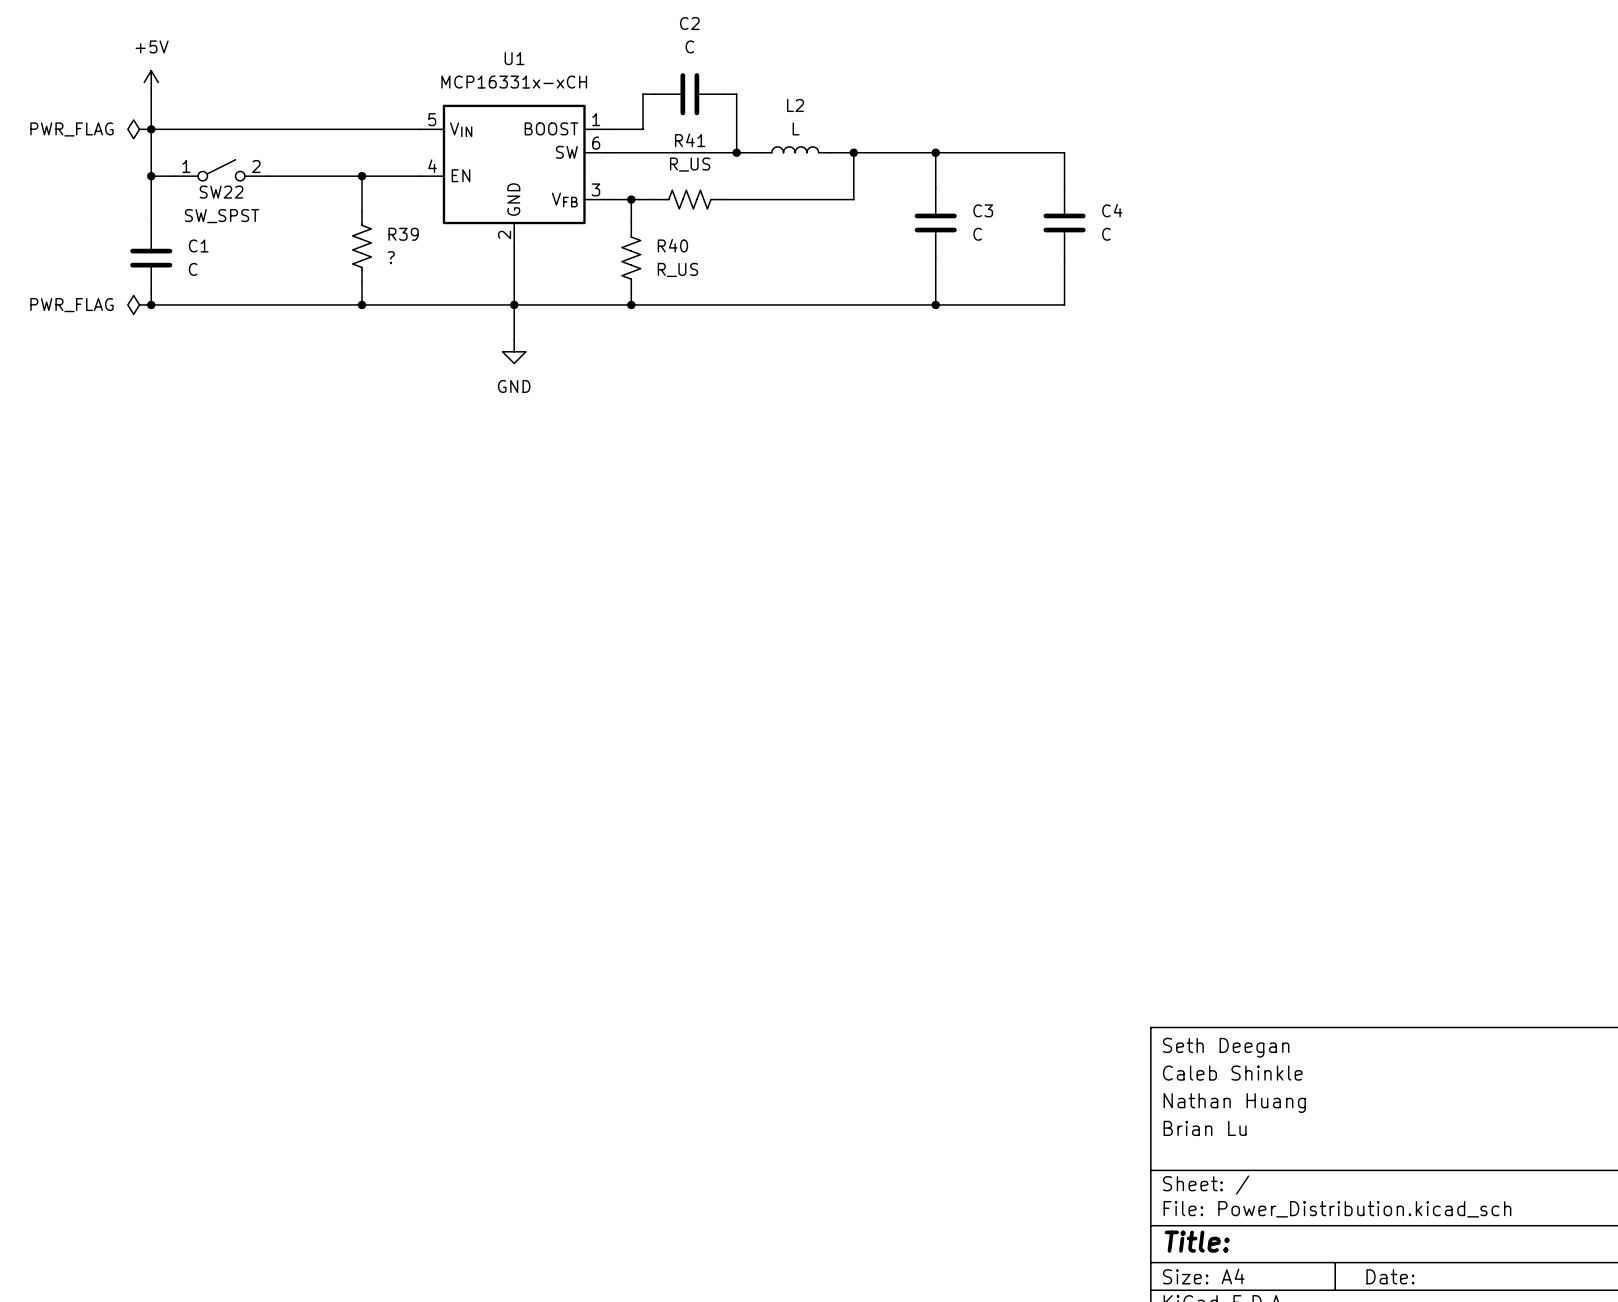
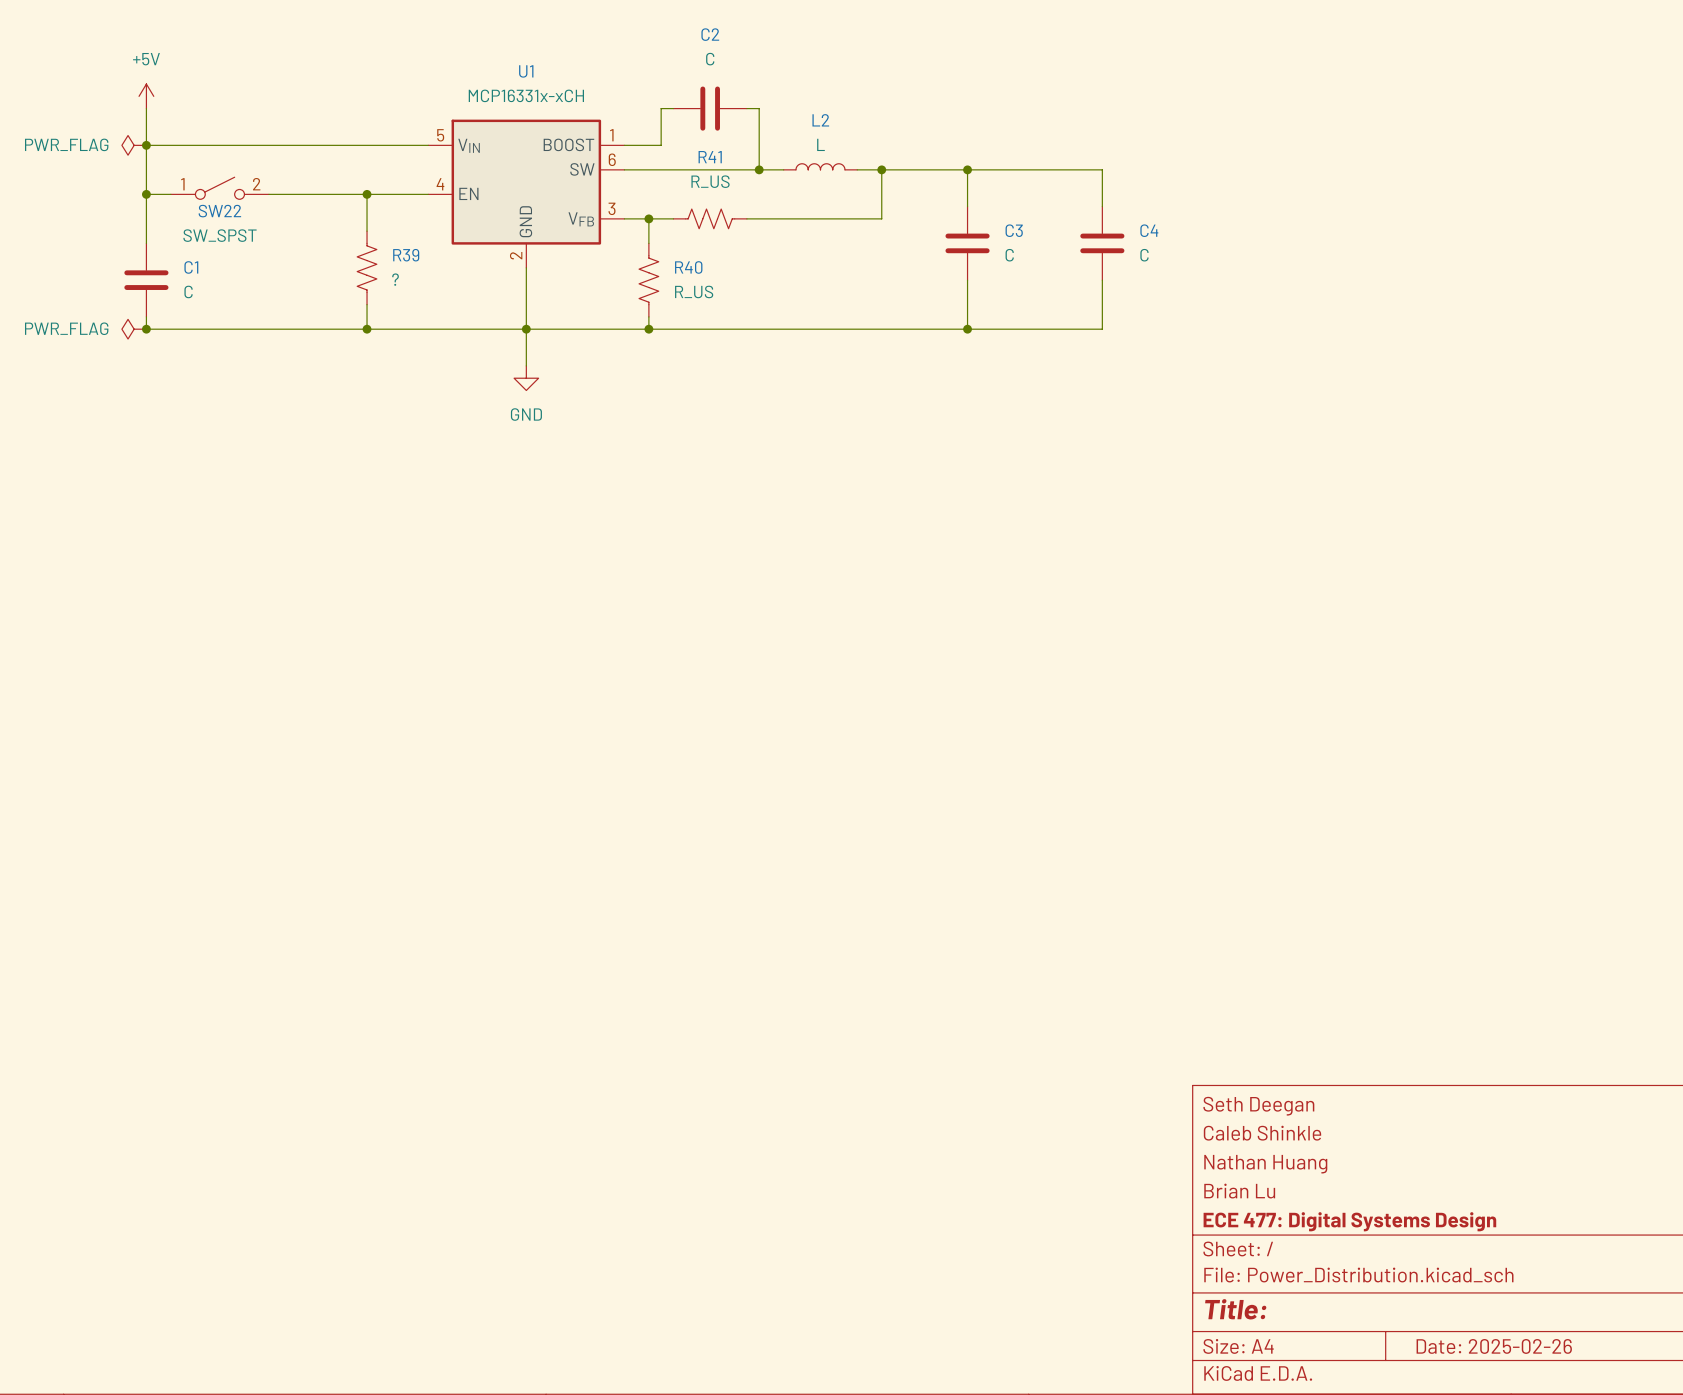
title block: none -> ECE 477: Digital Systems Design (1349, 1221)
title block: Date: (1390, 1276) -> Date: 2025-02-26 (1494, 1346)

